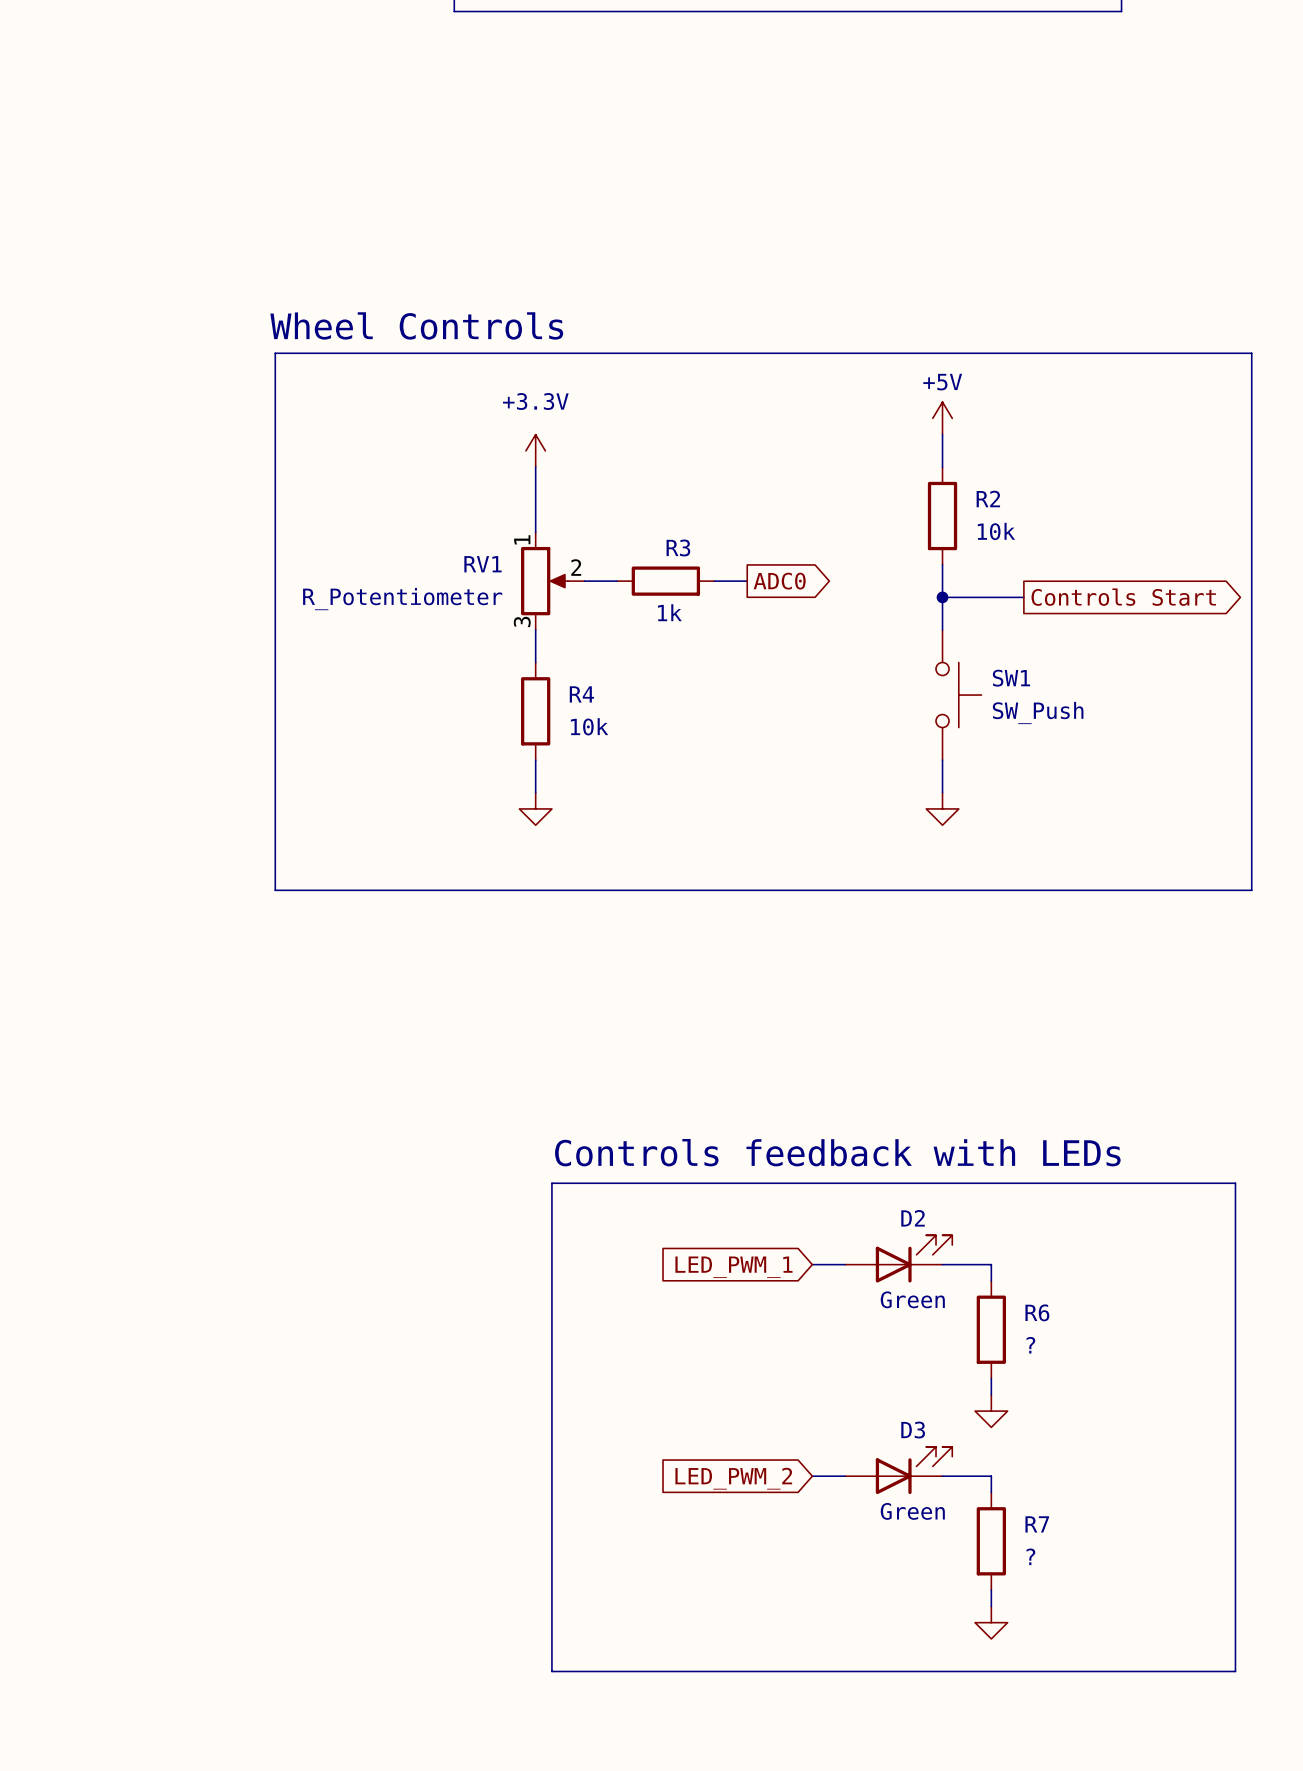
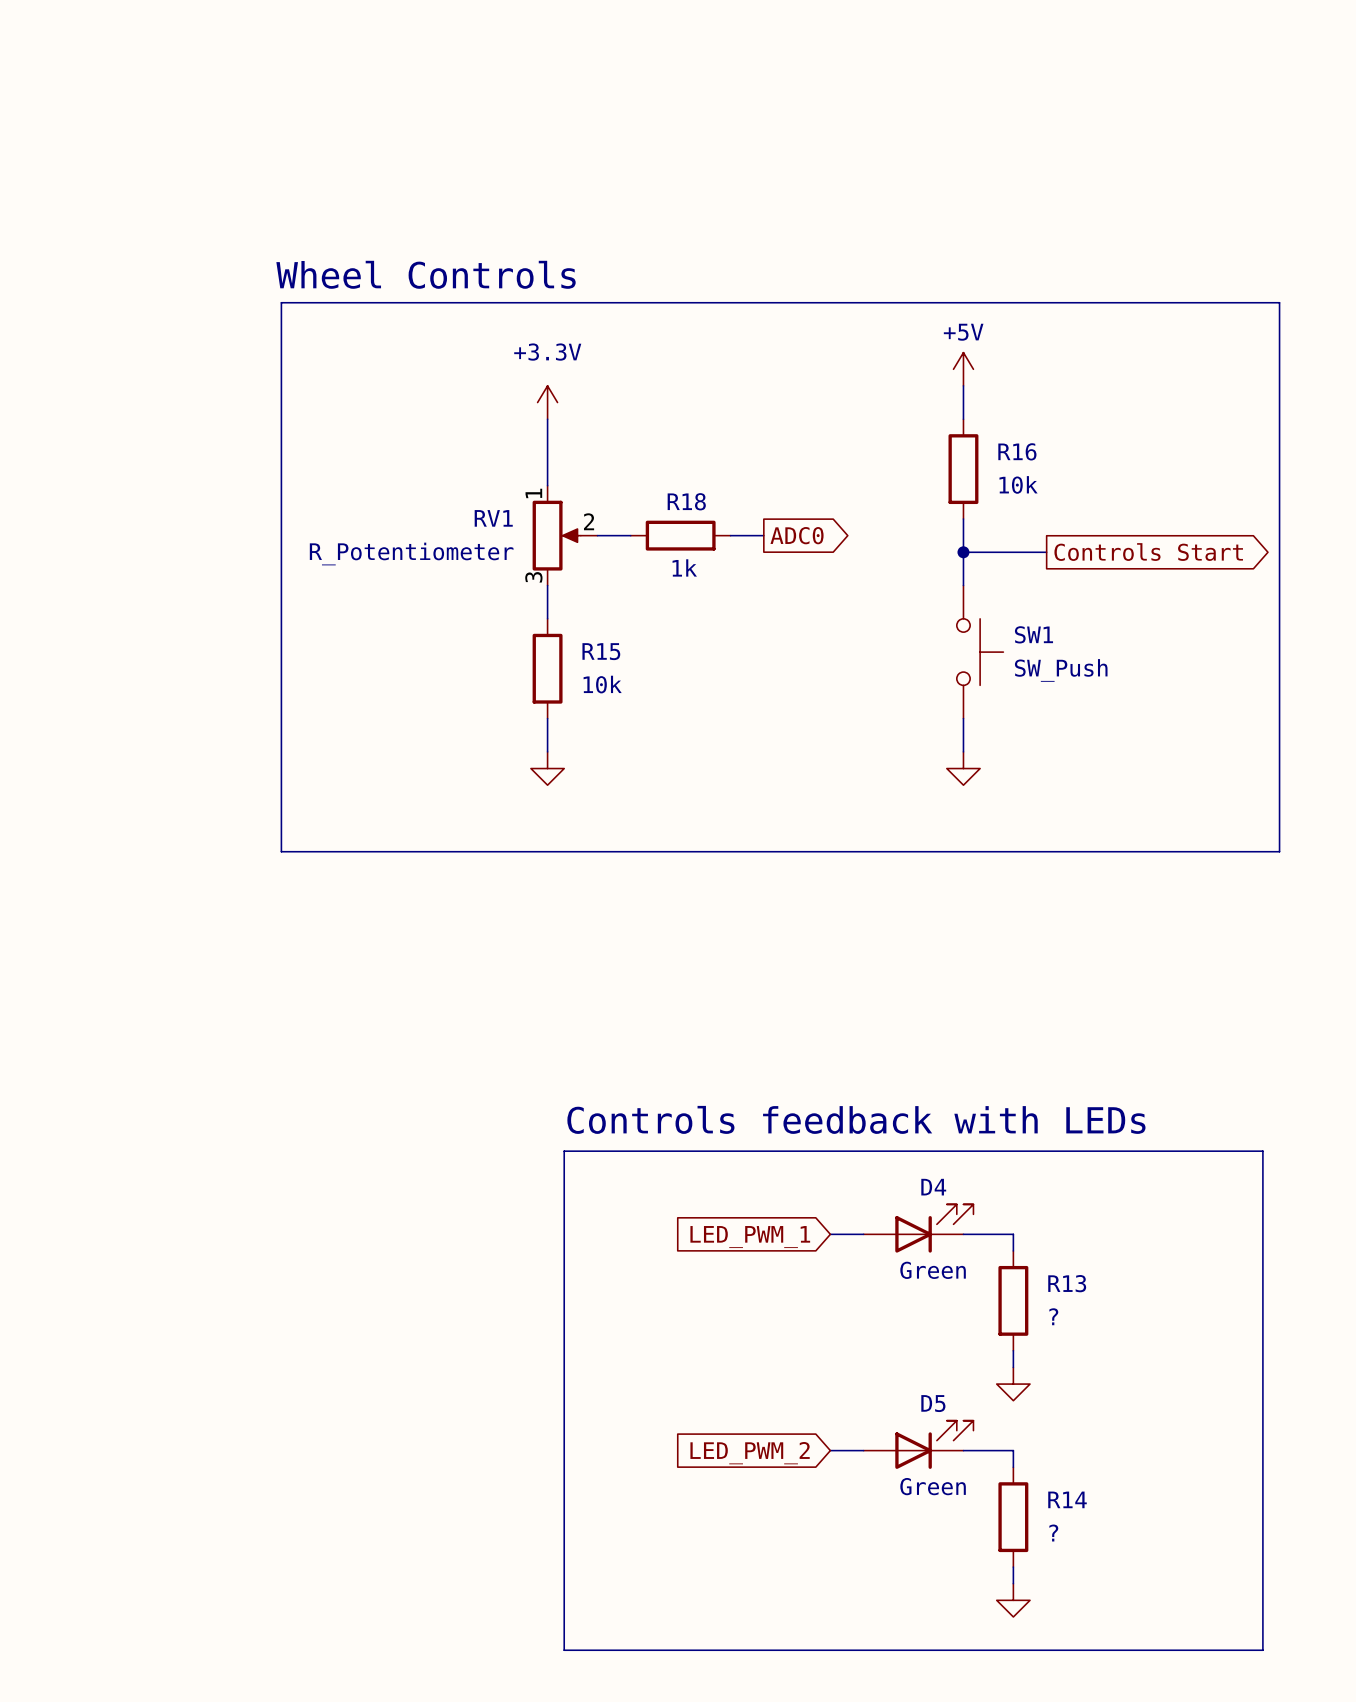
R2 name: R2 (988, 498) -> R16 (1017, 451)
R3 name: R3 (678, 547) -> R18 (686, 501)
R4 name: R4 (581, 694) -> R15 (601, 651)
D2 name: D2 (913, 1218) -> D4 (933, 1187)
R6 name: R6 (1037, 1312) -> R13 (1067, 1283)
D3 name: D3 (913, 1430) -> D5 (933, 1403)
R7 name: R7 (1037, 1524) -> R14 (1067, 1499)

